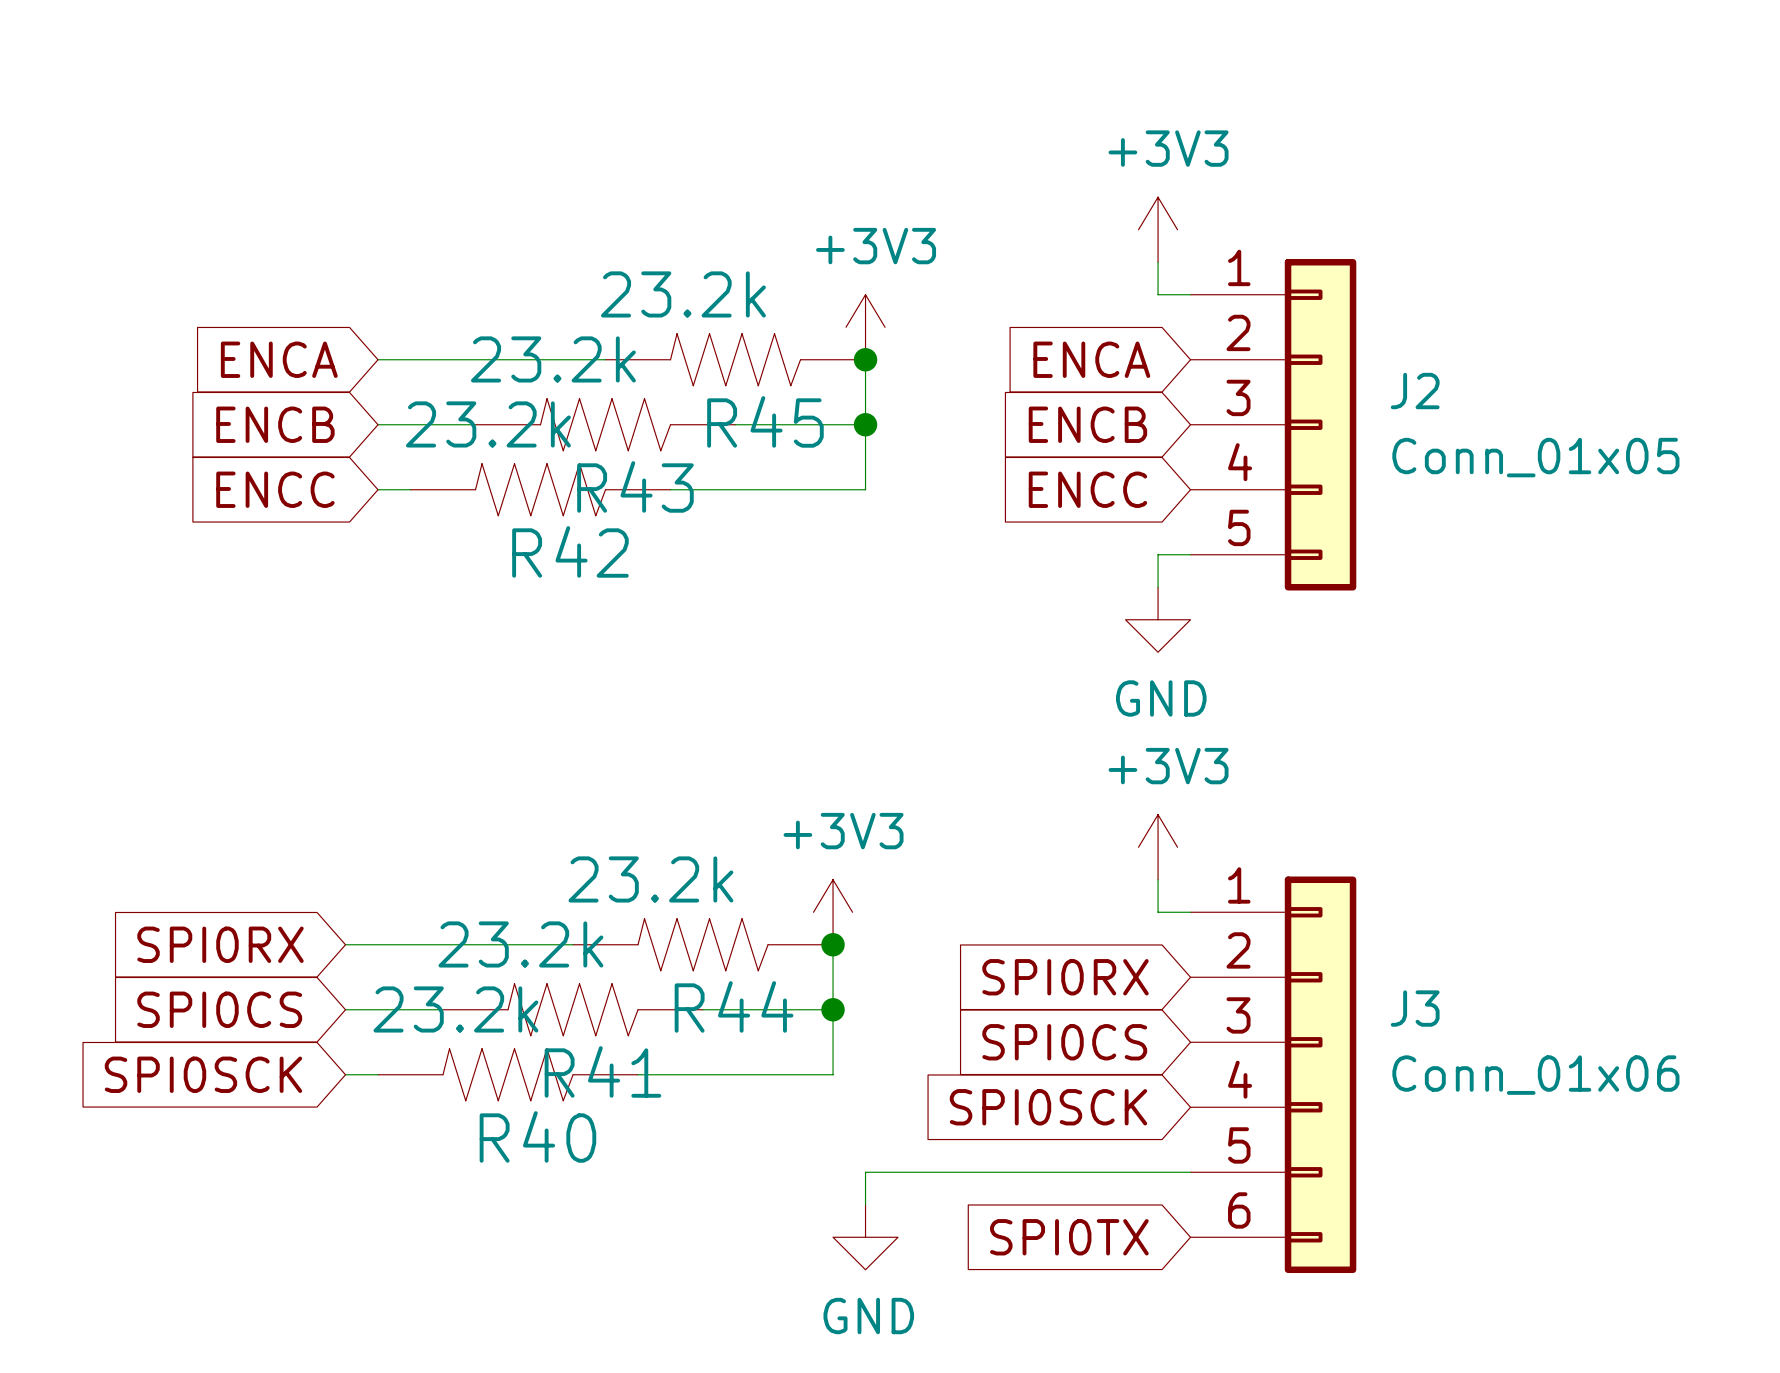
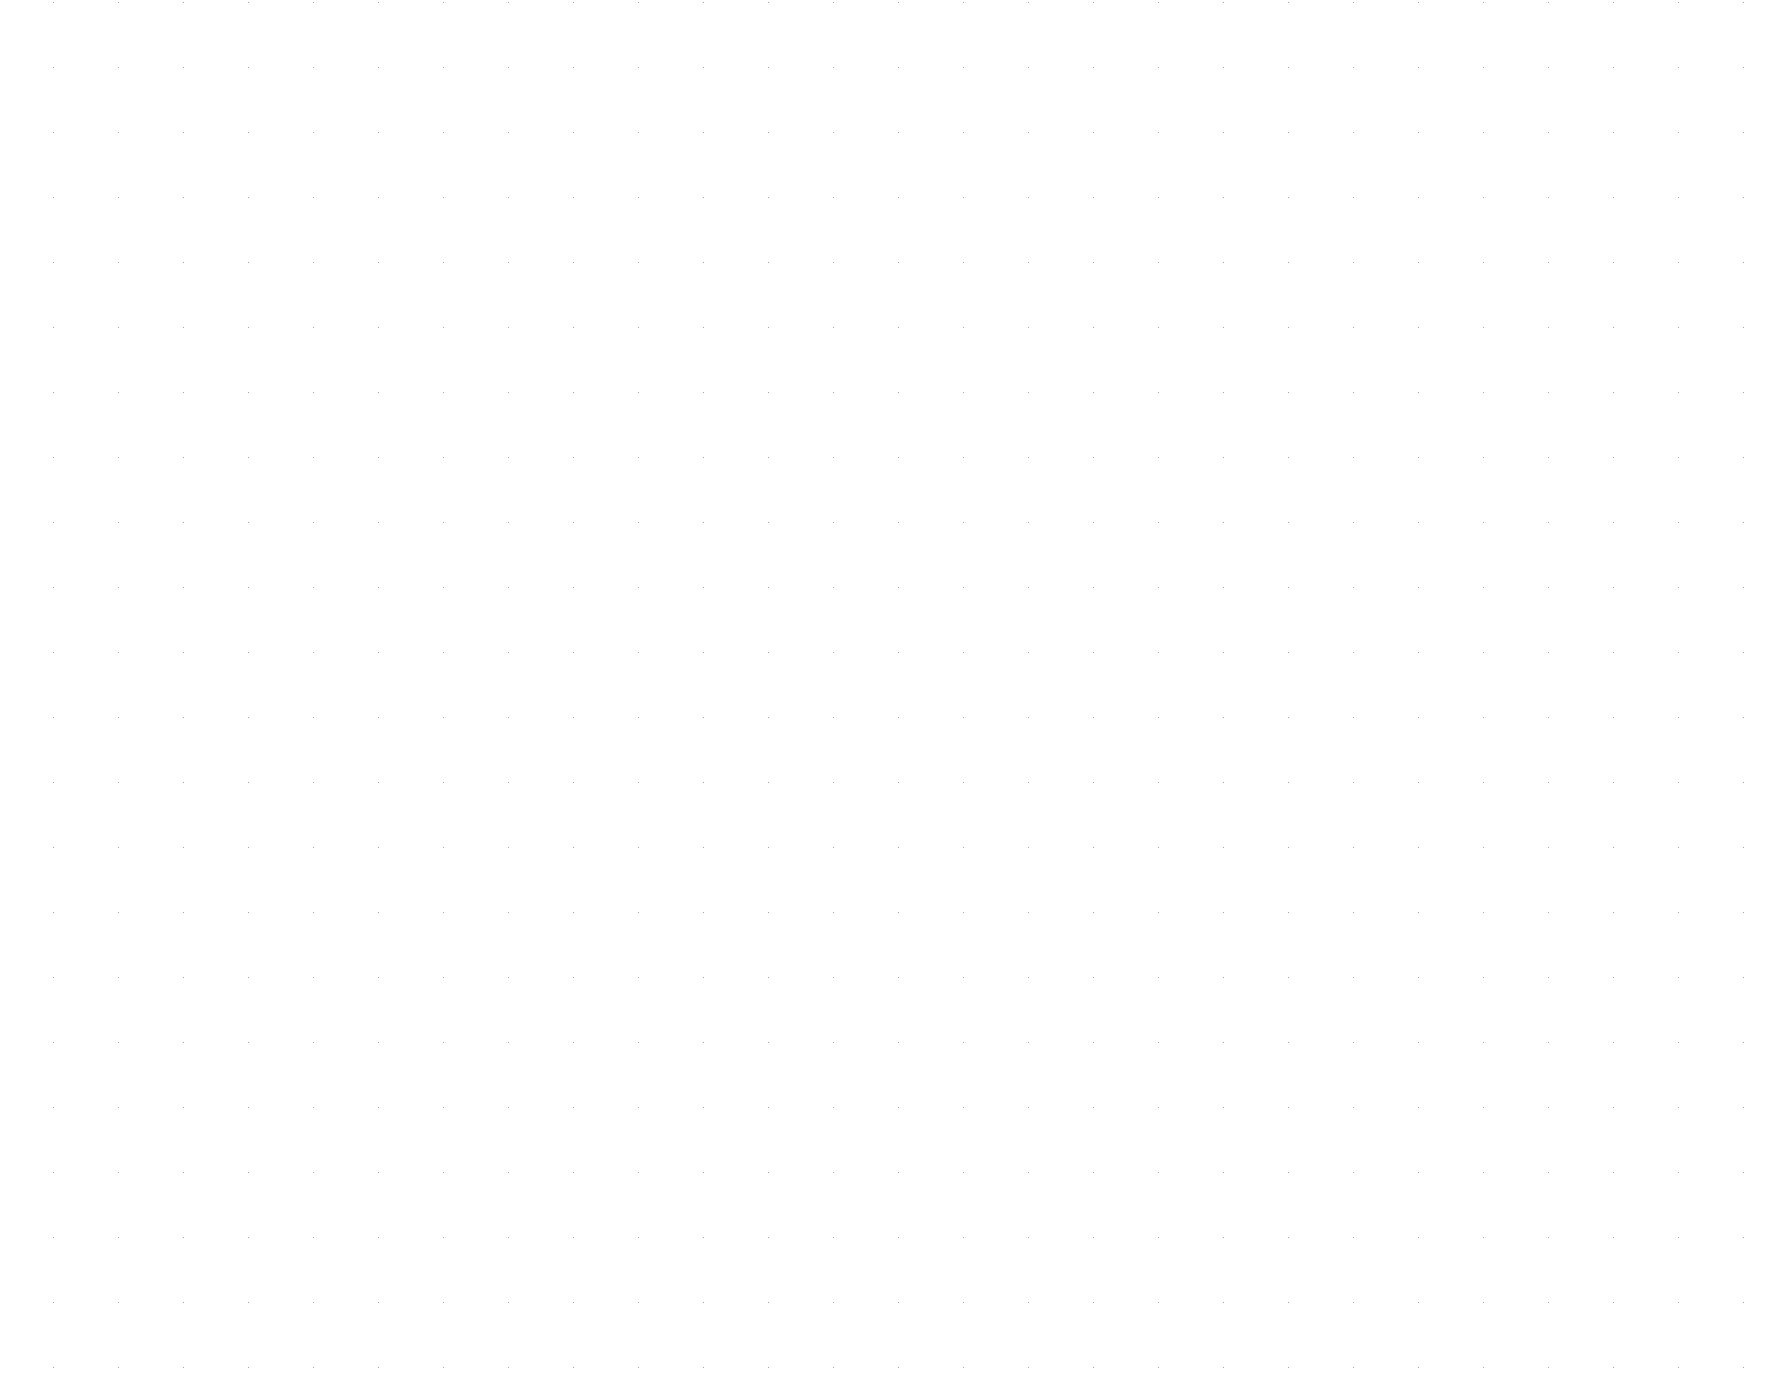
power symbol: +3V3 (1158, 229) -> none
wire: (1158, 262) (1158, 294) (1190, 294) -> none
power symbol: +3V3 (865, 327) -> none
global label: ENCA (279, 359) -> none
wire: (378, 359) (605, 359) -> none
R45: 23.2k (735, 359) -> none
wire: (865, 359) (865, 489) (670, 489) -> none
junction: (865, 359) -> none
global label: ENCA (1091, 359) -> none
global label: ENCB (275, 424) -> none
wire: (378, 424) (475, 424) -> none
R43: 23.2k (605, 424) -> none
wire: (735, 424) (865, 424) -> none
junction: (865, 424) -> none
global label: ENCB (1087, 424) -> none
J2: Conn_01x05 (1273, 424) -> none
global label: ENCC (275, 489) -> none
wire: (378, 489) (410, 489) -> none
R42: 23.2k (540, 489) -> none
global label: ENCC (1087, 489) -> none
wire: (1190, 554) (1158, 554) (1158, 587) -> none
power symbol: GND (1158, 619) -> none
power symbol: +3V3 (1158, 847) -> none
wire: (1158, 879) (1158, 912) (1190, 912) -> none
power symbol: +3V3 (833, 912) -> none
global label: SPI0RX (220, 944) -> none
wire: (345, 944) (573, 944) -> none
R44: 23.2k (703, 944) -> none
wire: (833, 944) (833, 1074) (638, 1074) -> none
junction: (833, 944) -> none
global label: SPI0RX (1065, 977) -> none
global label: SPI0CS (219, 1009) -> none
wire: (345, 1009) (443, 1009) -> none
R41: 23.2k (573, 1009) -> none
wire: (703, 1009) (833, 1009) -> none
junction: (833, 1009) -> none
global label: SPI0CS (1064, 1042) -> none
global label: SPI0SCK (203, 1074) -> none
wire: (345, 1074) (378, 1074) -> none
R40: 23.2k (508, 1074) -> none
J3: Conn_01x06 (1273, 1074) -> none
global label: SPI0SCK (1048, 1107) -> none
wire: (1190, 1172) (865, 1172) (865, 1204) -> none
power symbol: GND (865, 1237) -> none
global label: SPI0TX (1069, 1237) -> none

